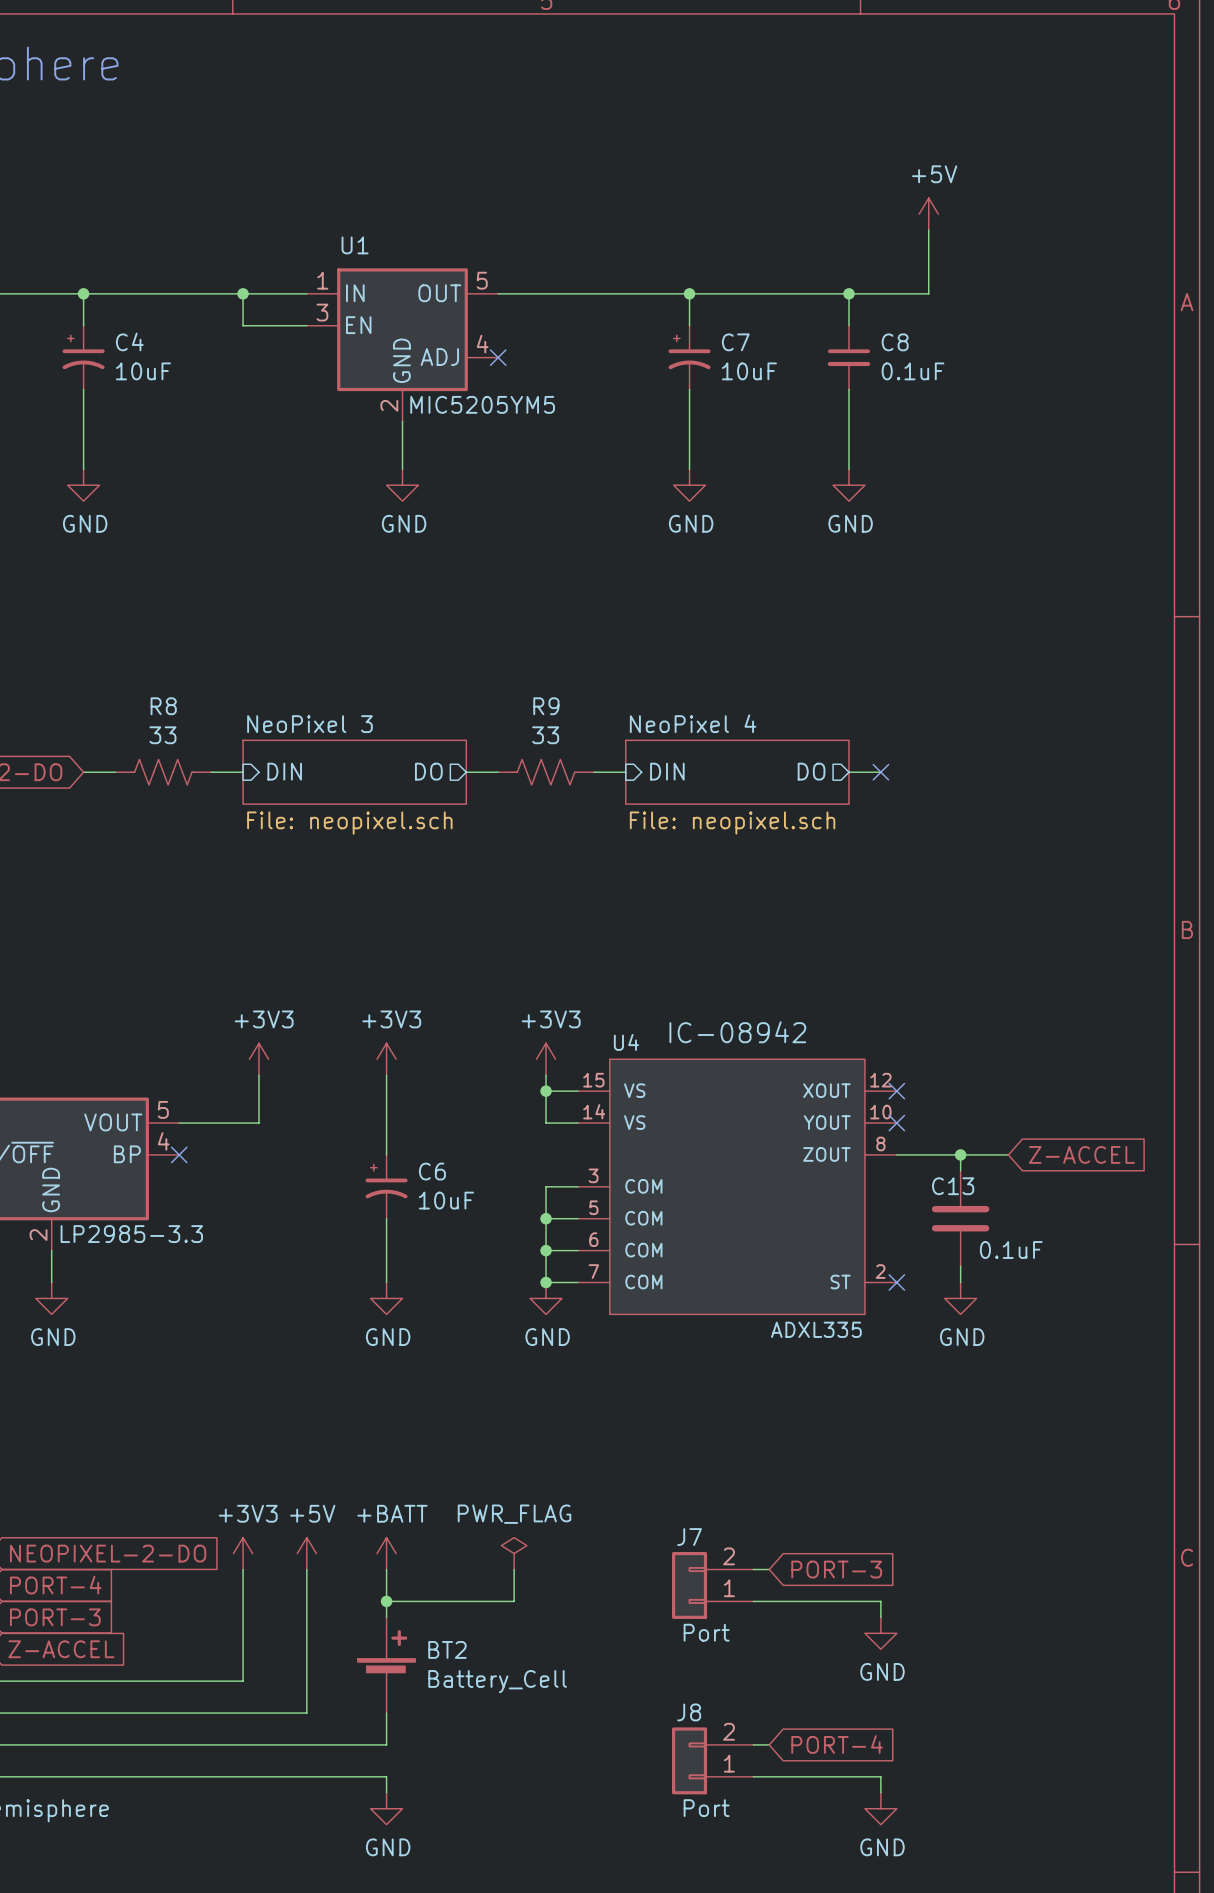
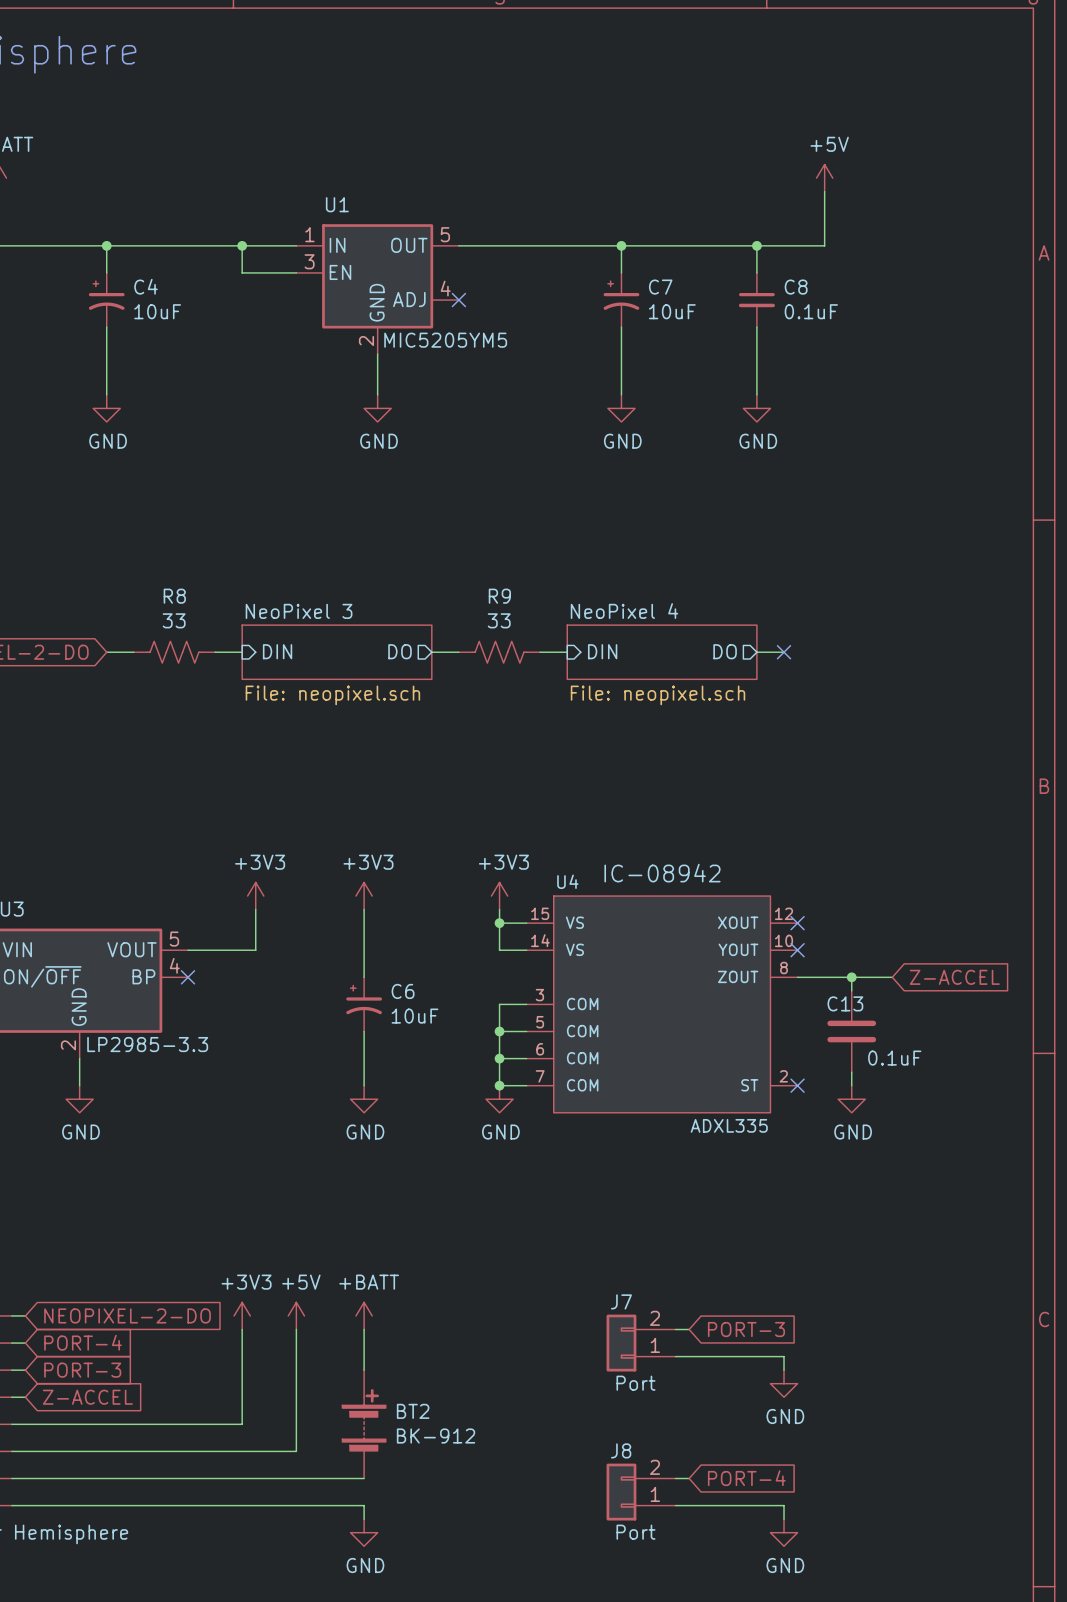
power symbol: PWR_FLAG (514, 1553) -> none
wire: (514, 1569) (514, 1601) (386, 1601) -> none
junction: (386, 1601) -> none
BT2 symbol: [357, 1617, 416, 1714] -> [342, 1370, 386, 1479]
BT2 value: Battery_Cell (497, 1681) -> BK-912 (436, 1436)

